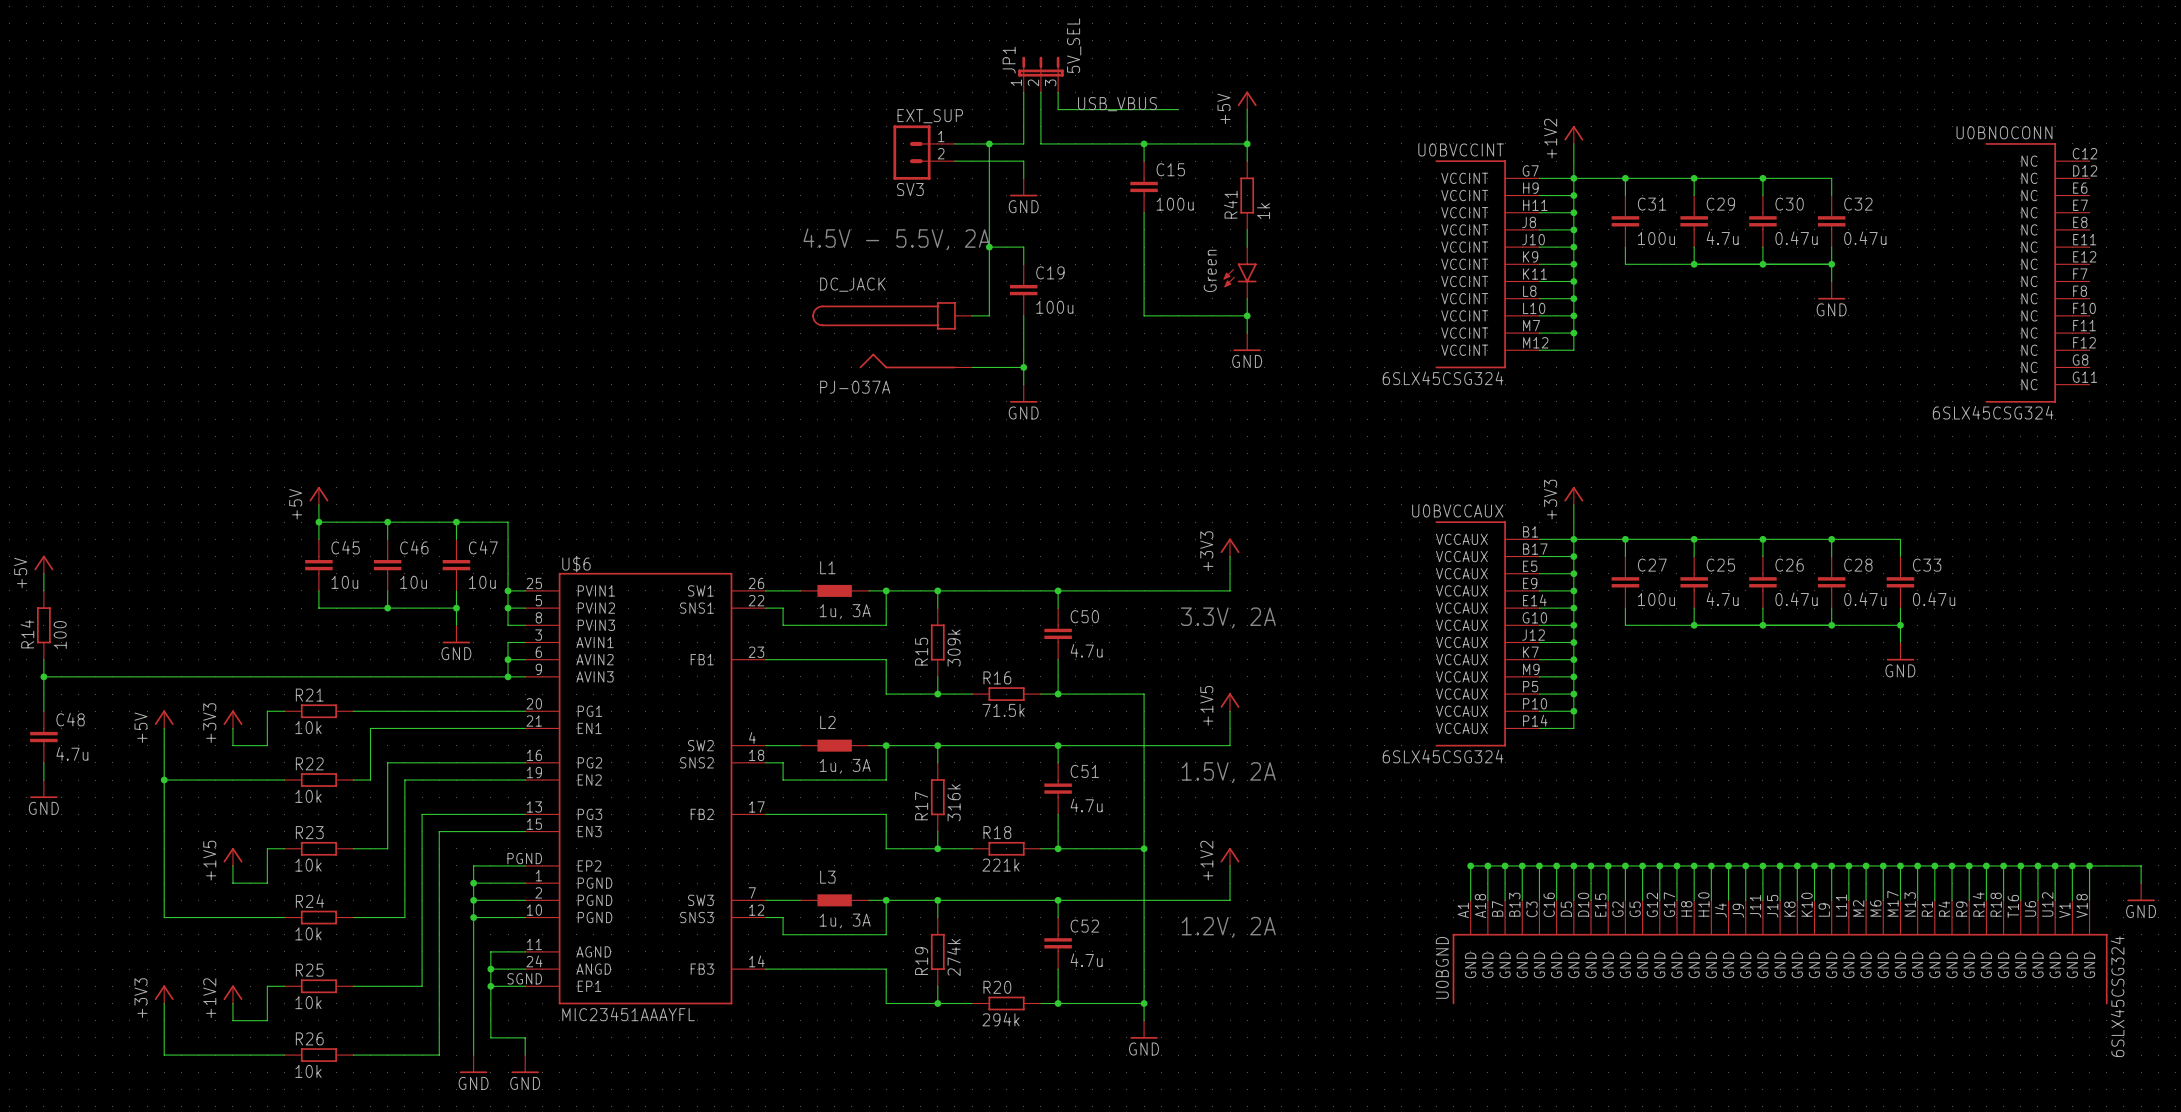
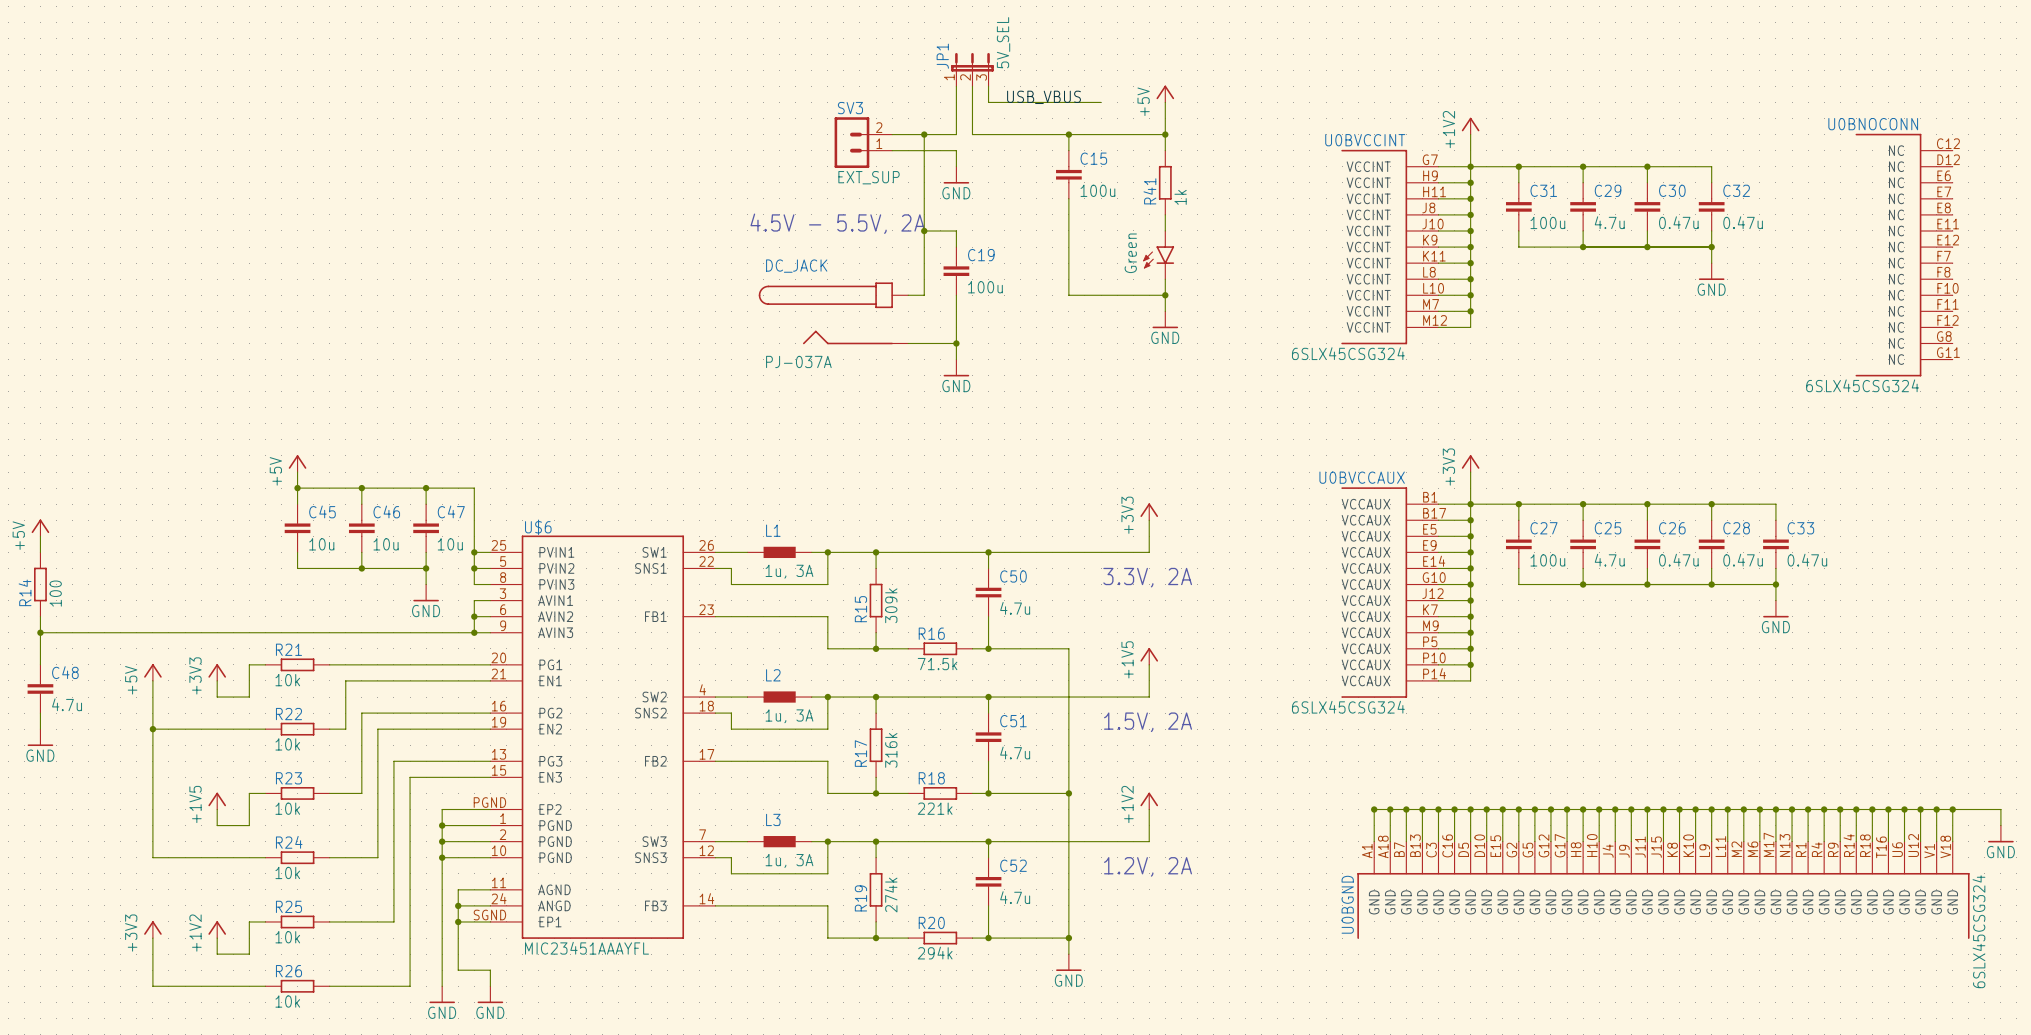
SV3 flip: as is (912, 152) -> up-down (851, 142)

